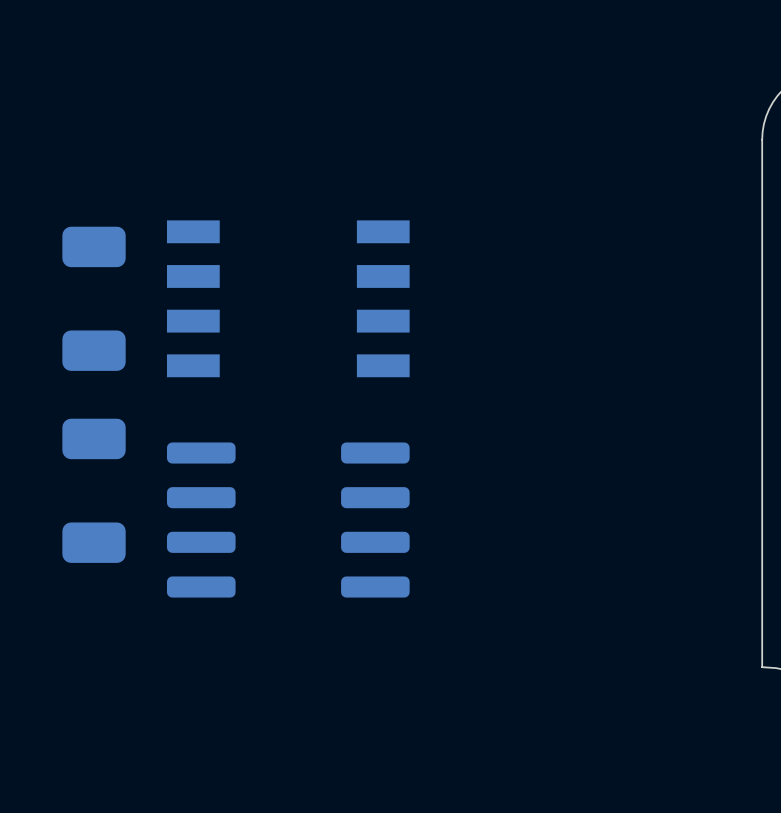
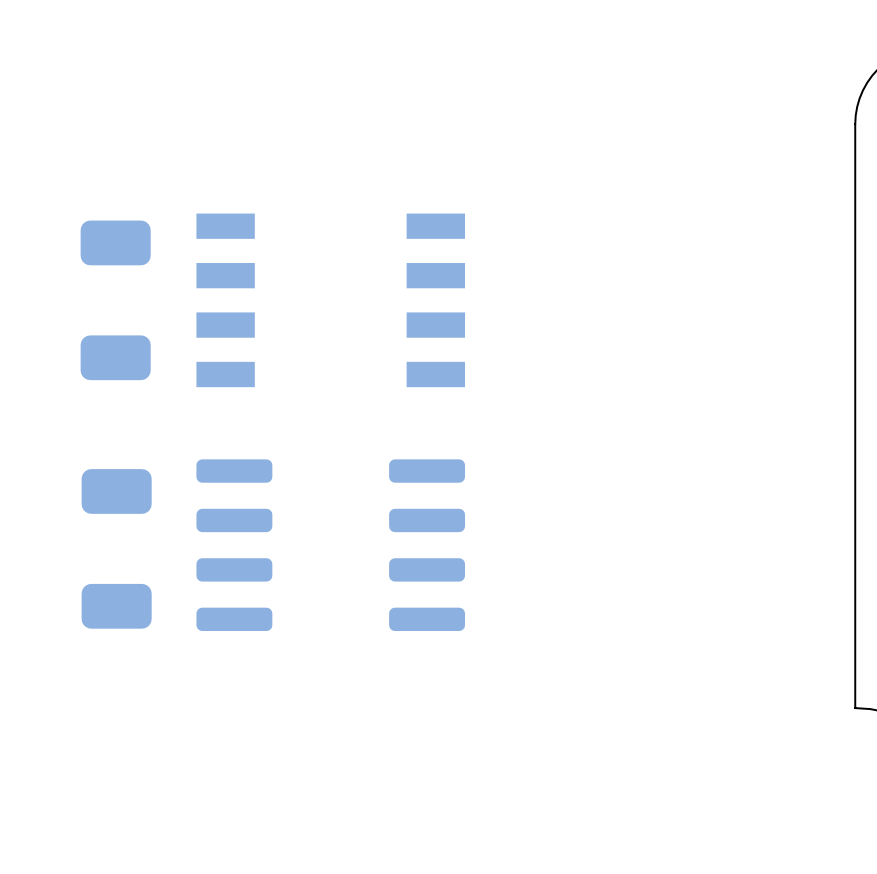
part position: (94, 490) -> (116, 548)

